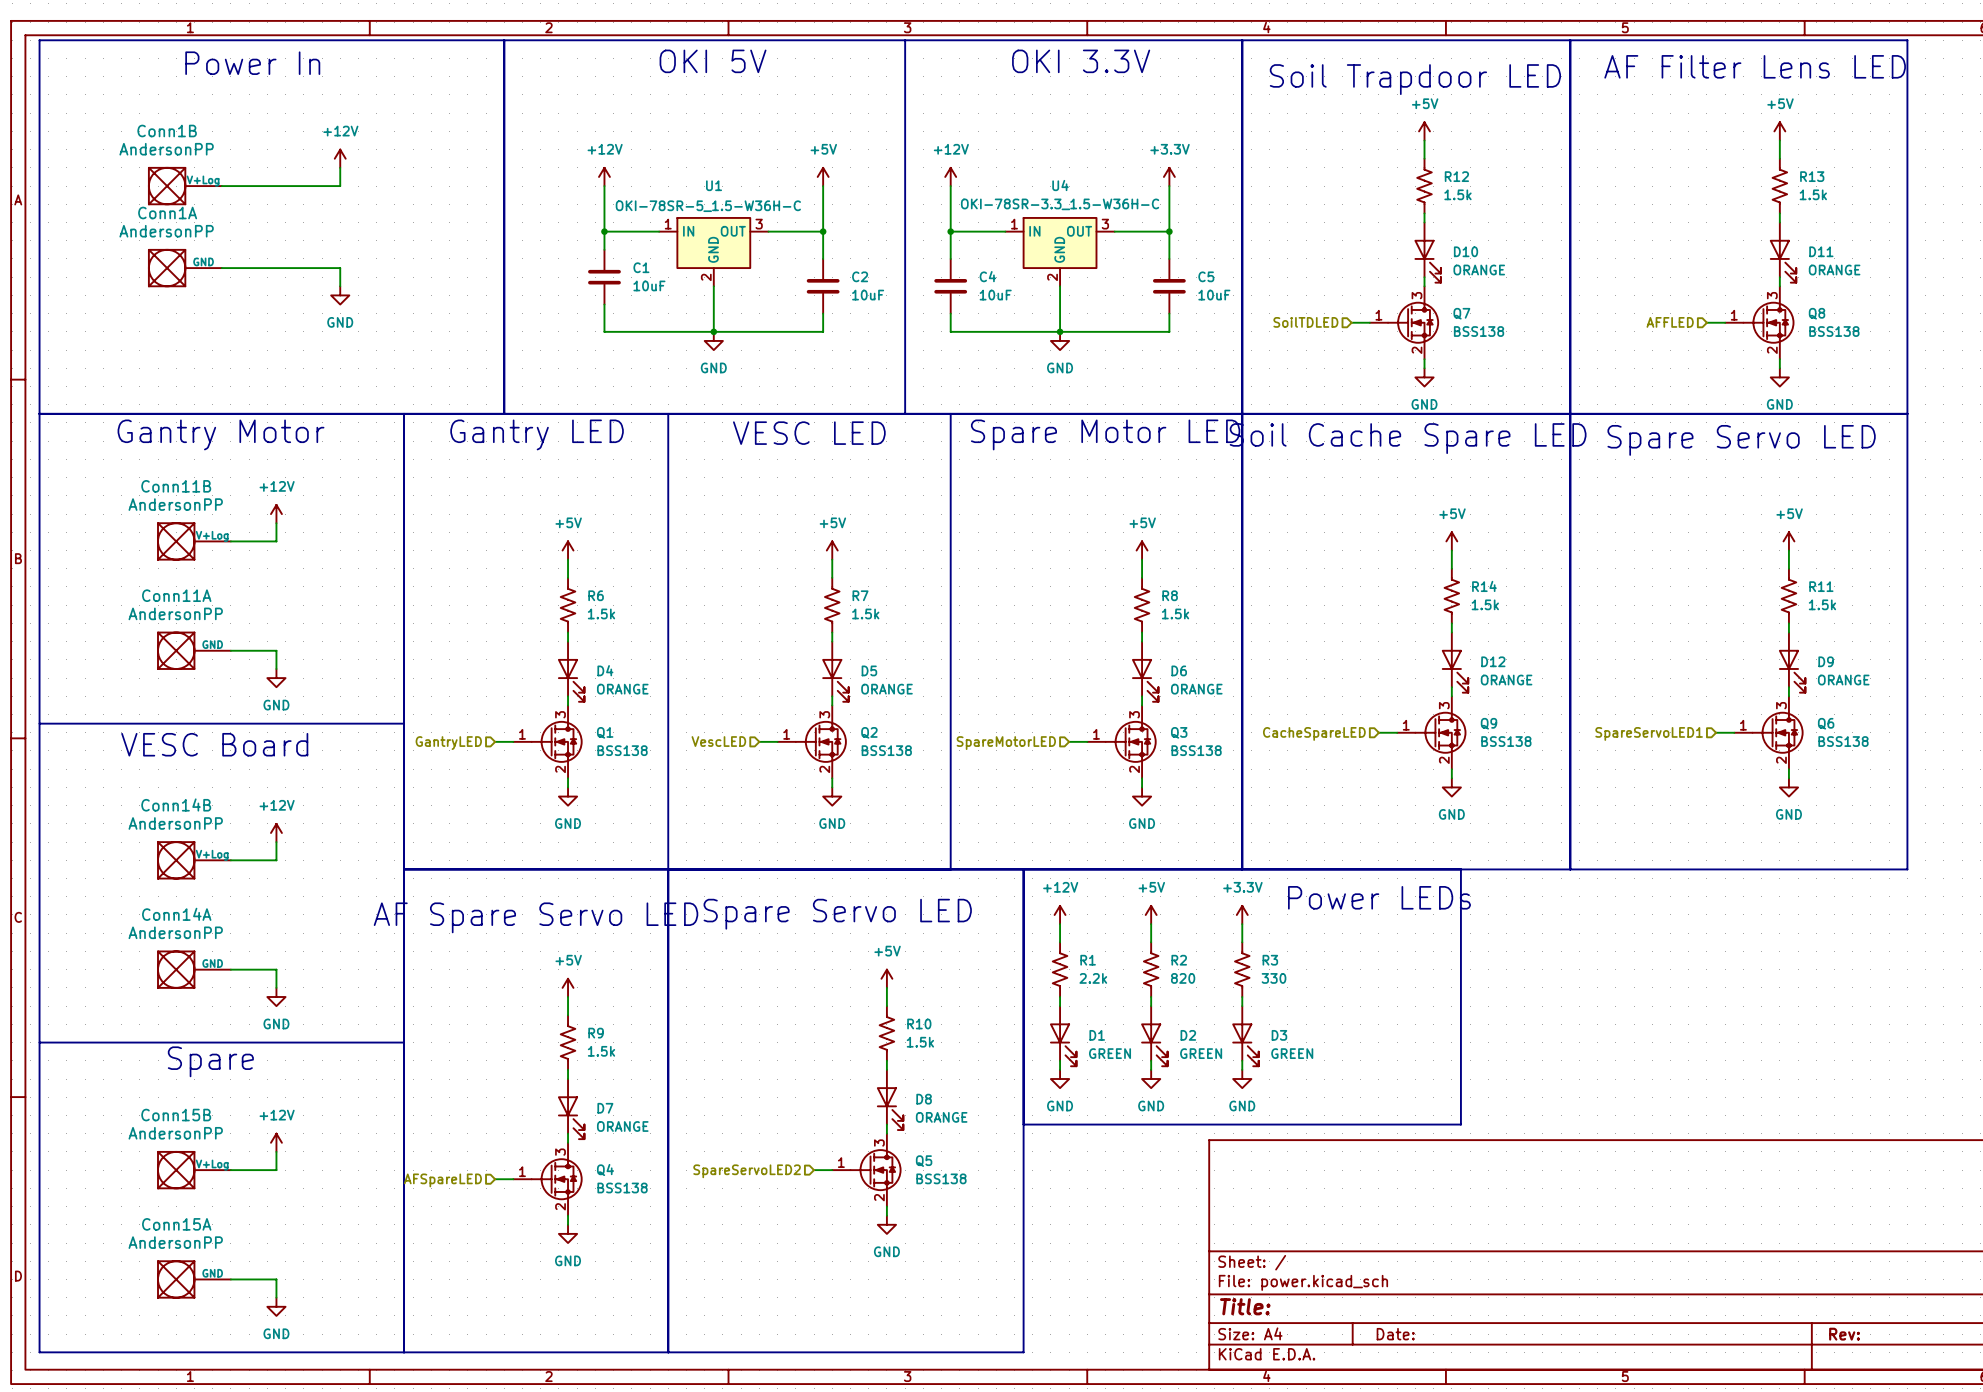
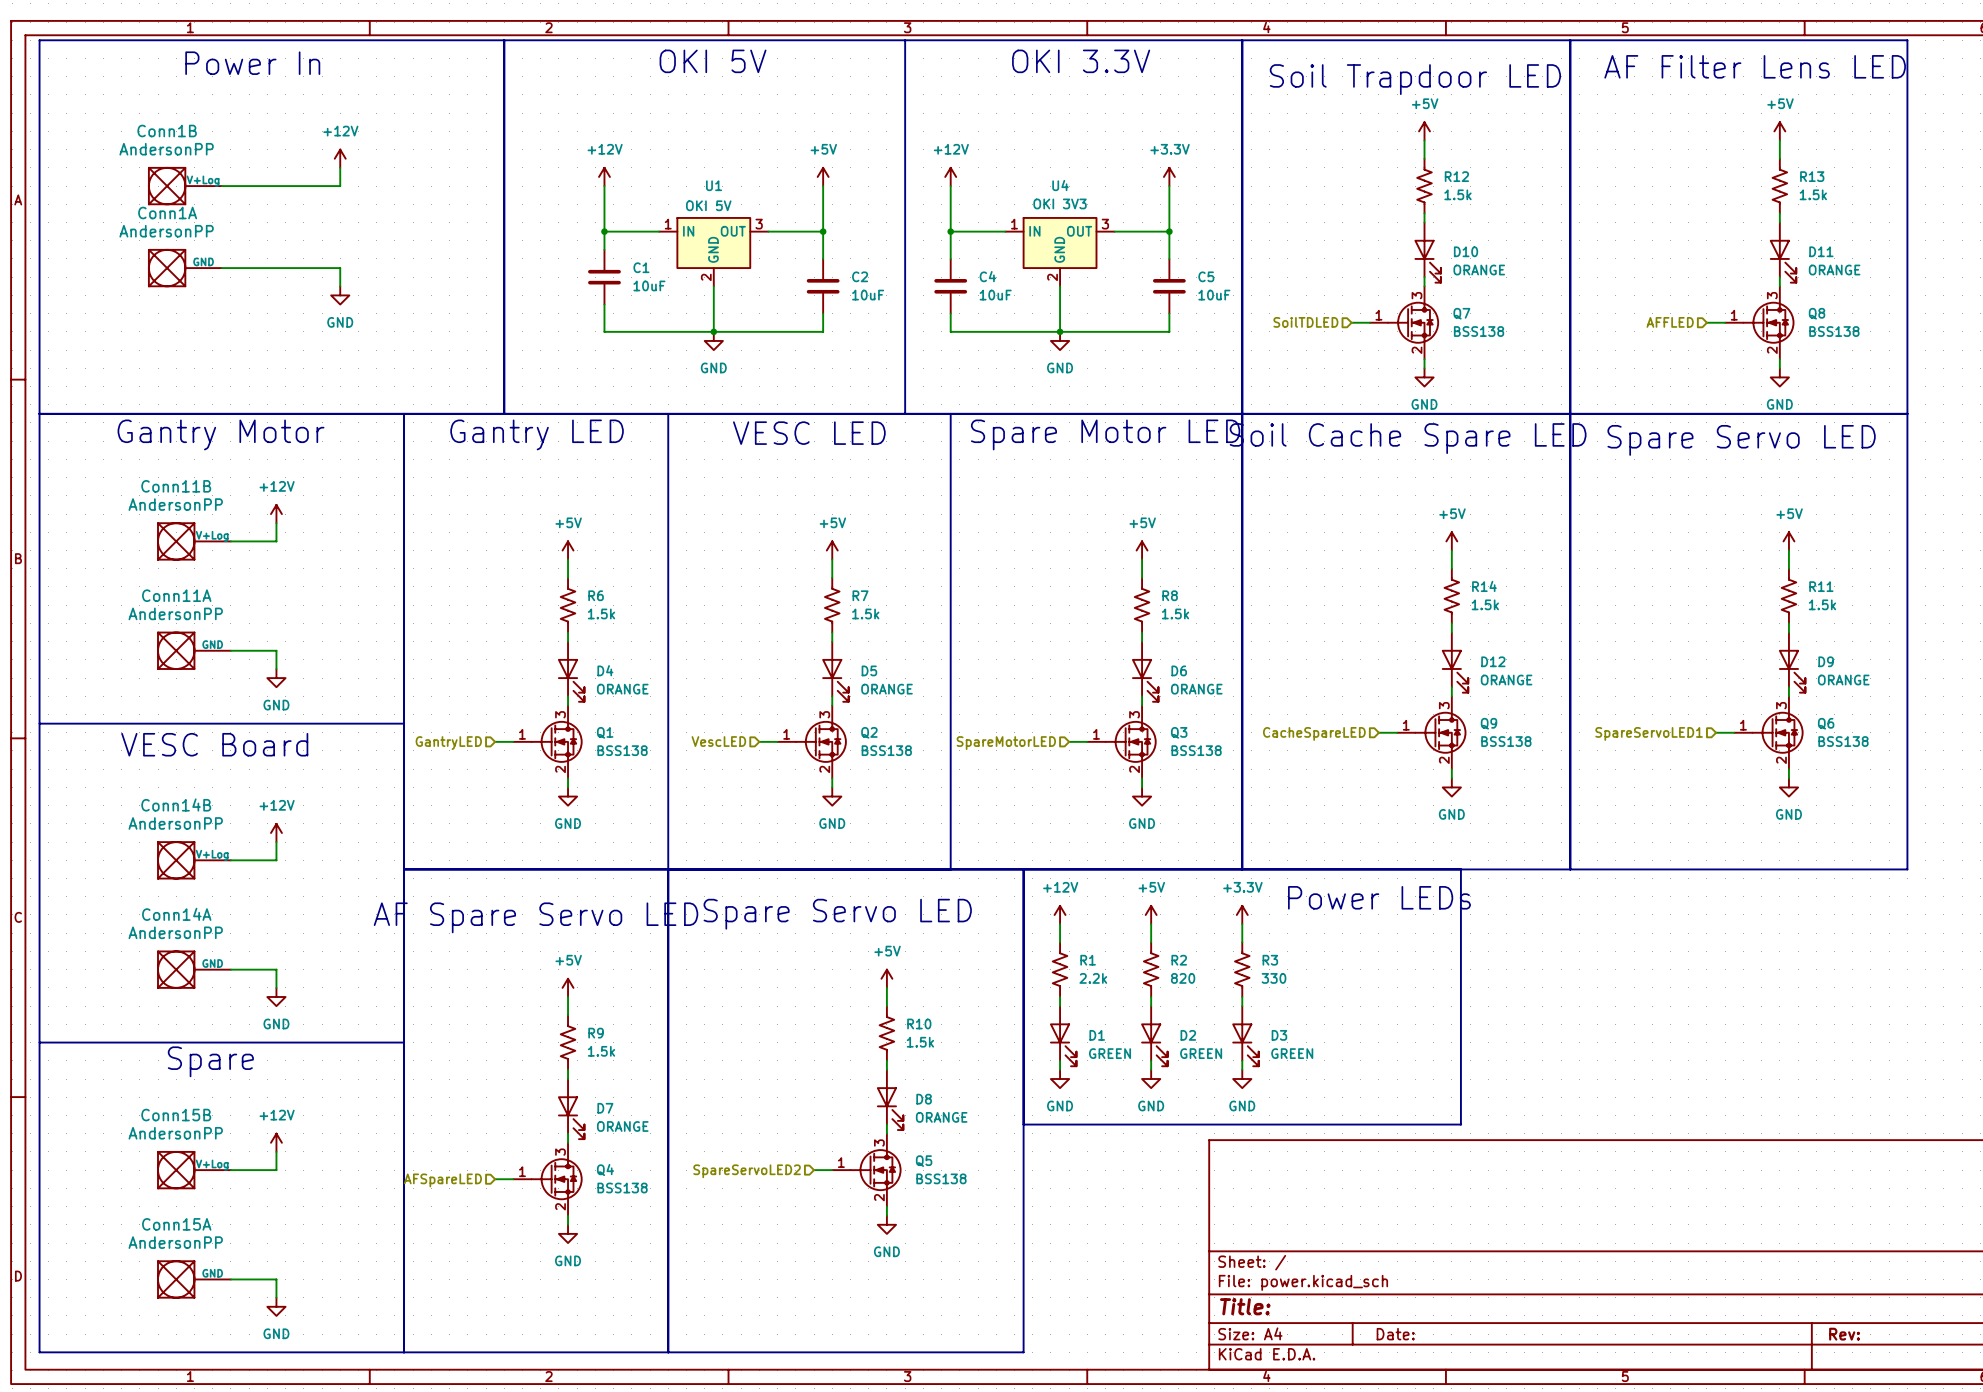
U4 value: OKI-78SR-3.3_1.5-W36H-C (1060, 204) -> OKI 3V3 (1060, 203)
U1 value: OKI-78SR-5_1.5-W36H-C (708, 206) -> OKI 5V (708, 205)

